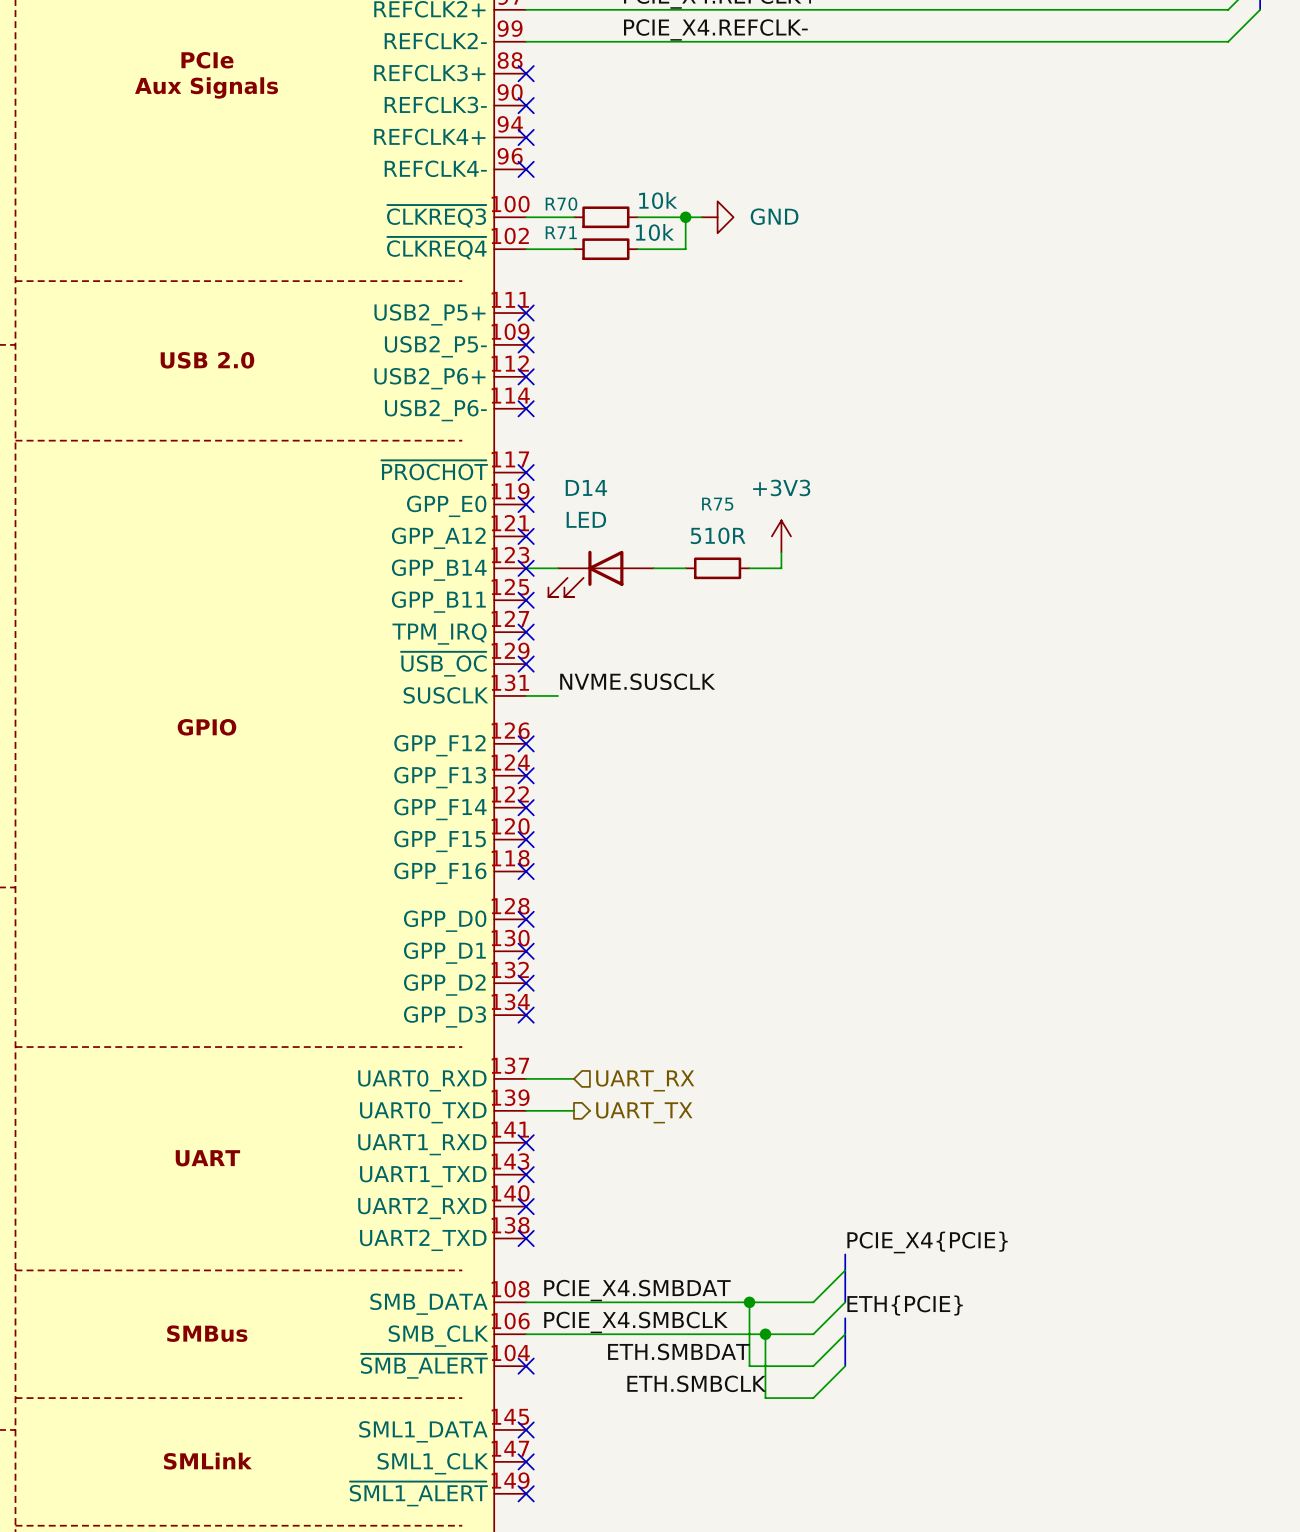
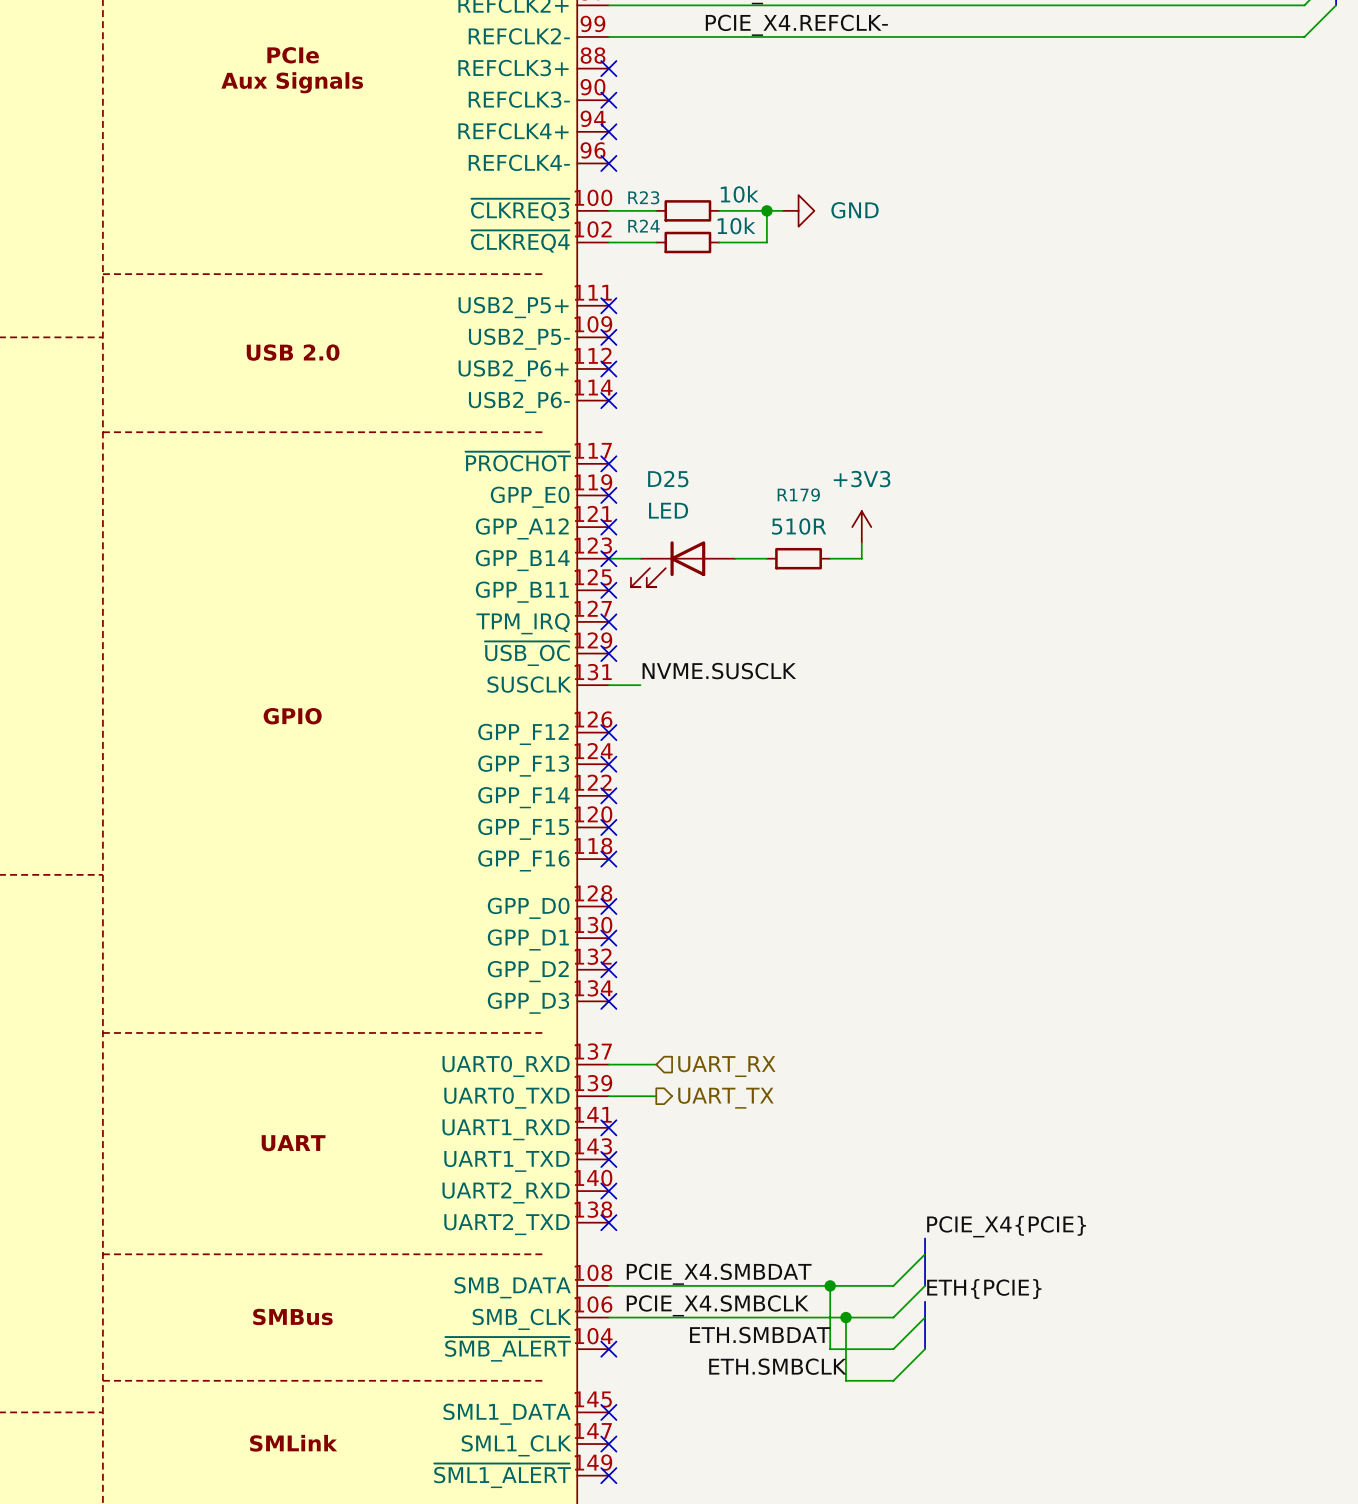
R70 name: R70 (561, 204) -> R23 (643, 197)
R71 name: R71 (561, 232) -> R24 (643, 226)
D14 name: D14 (586, 487) -> D25 (668, 479)
R75 name: R75 (717, 504) -> R179 (798, 494)

